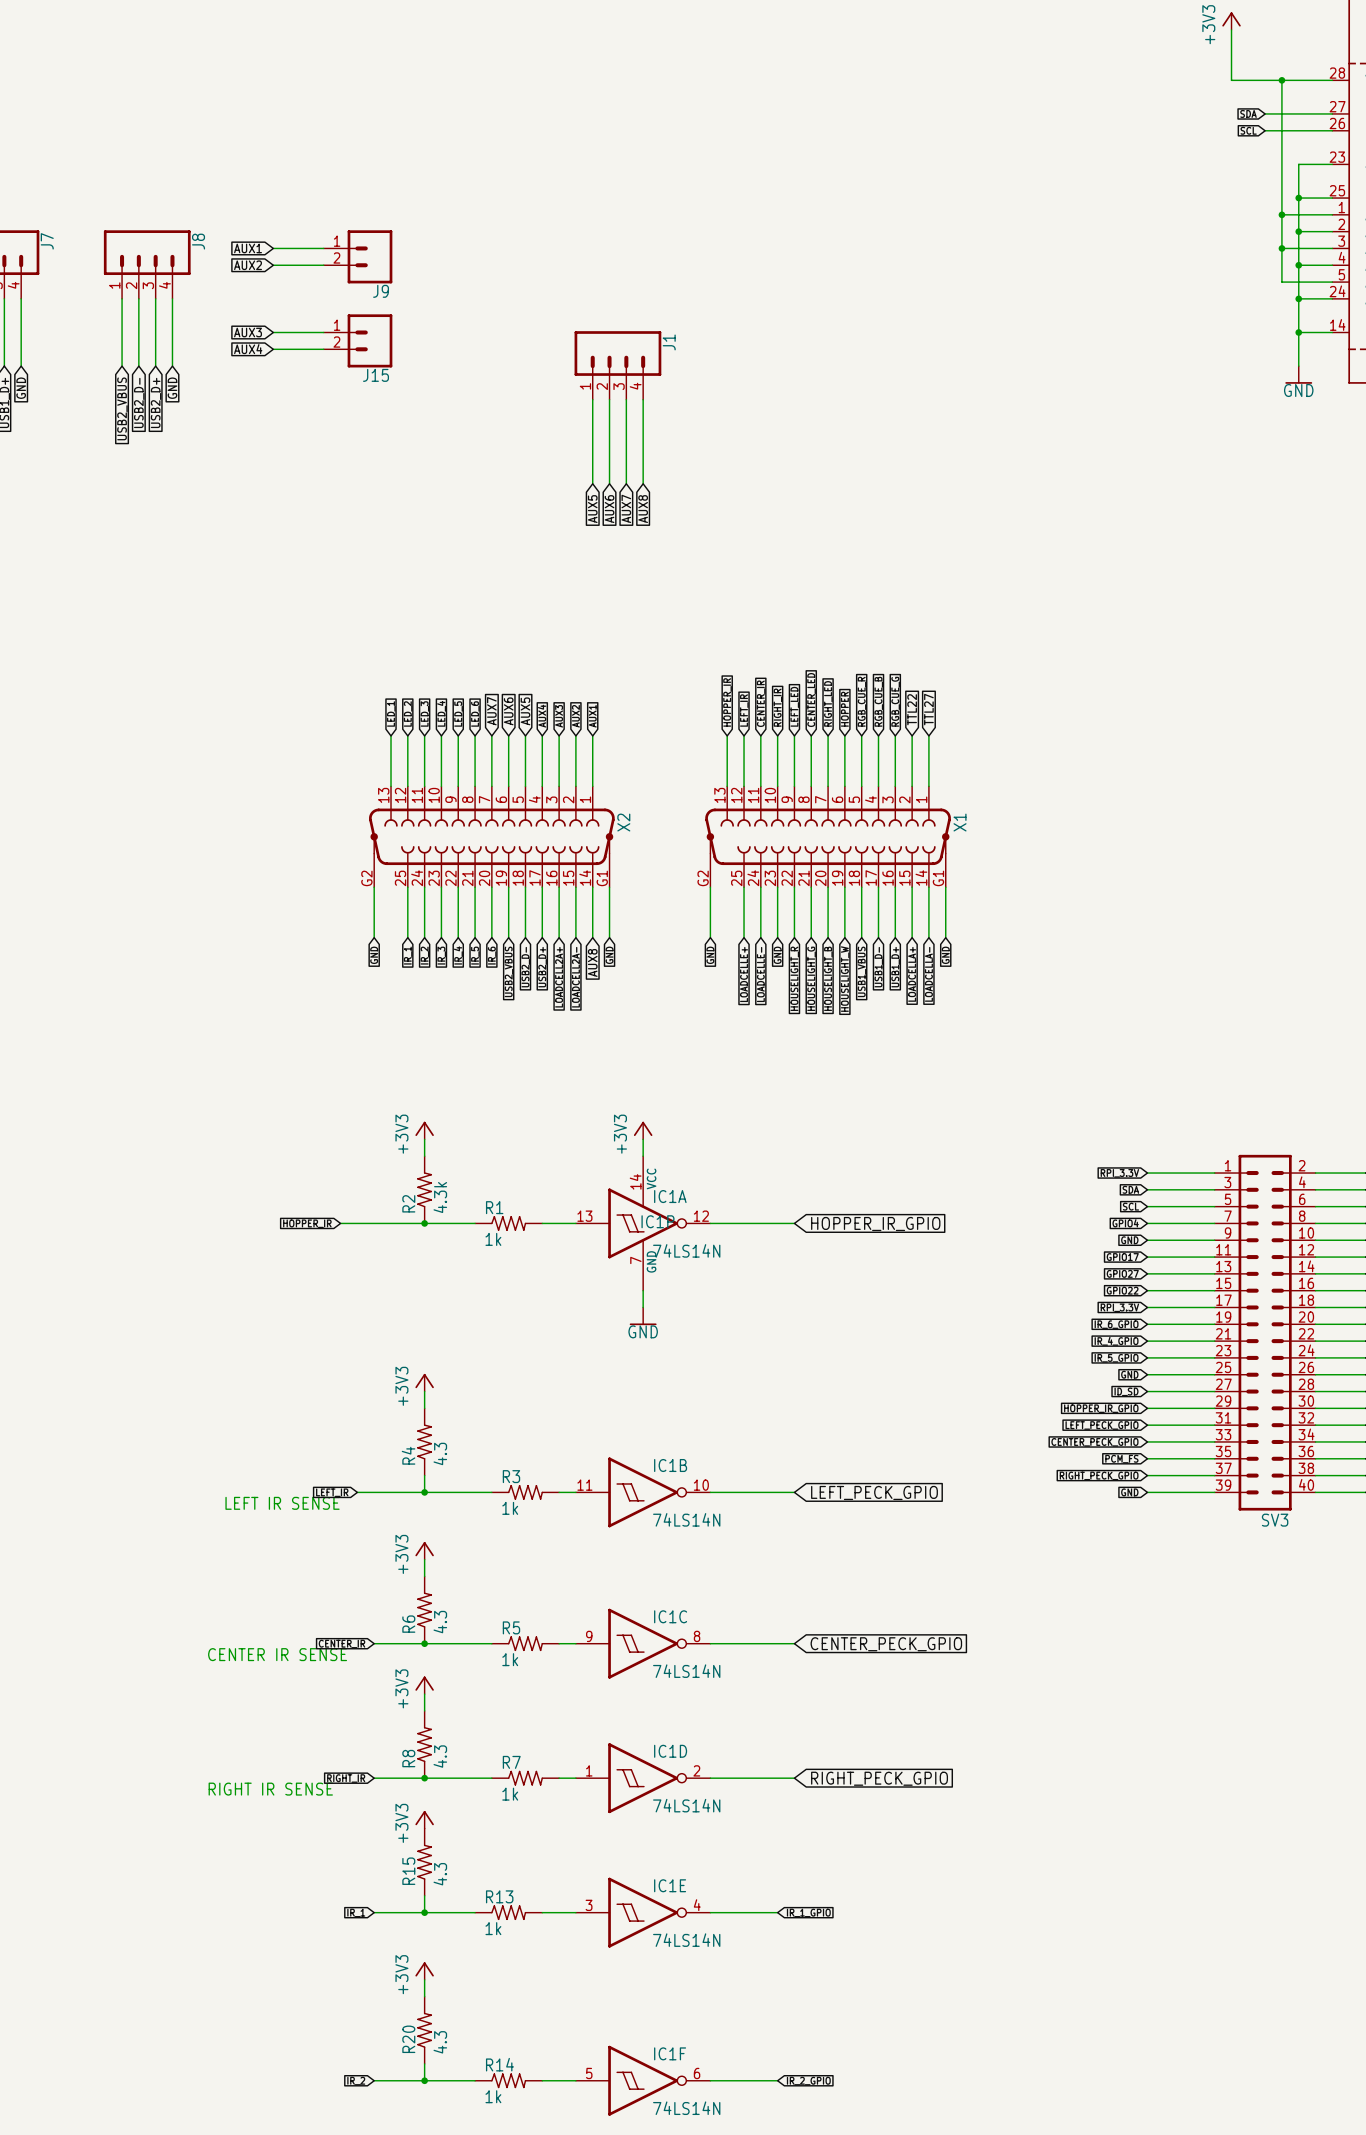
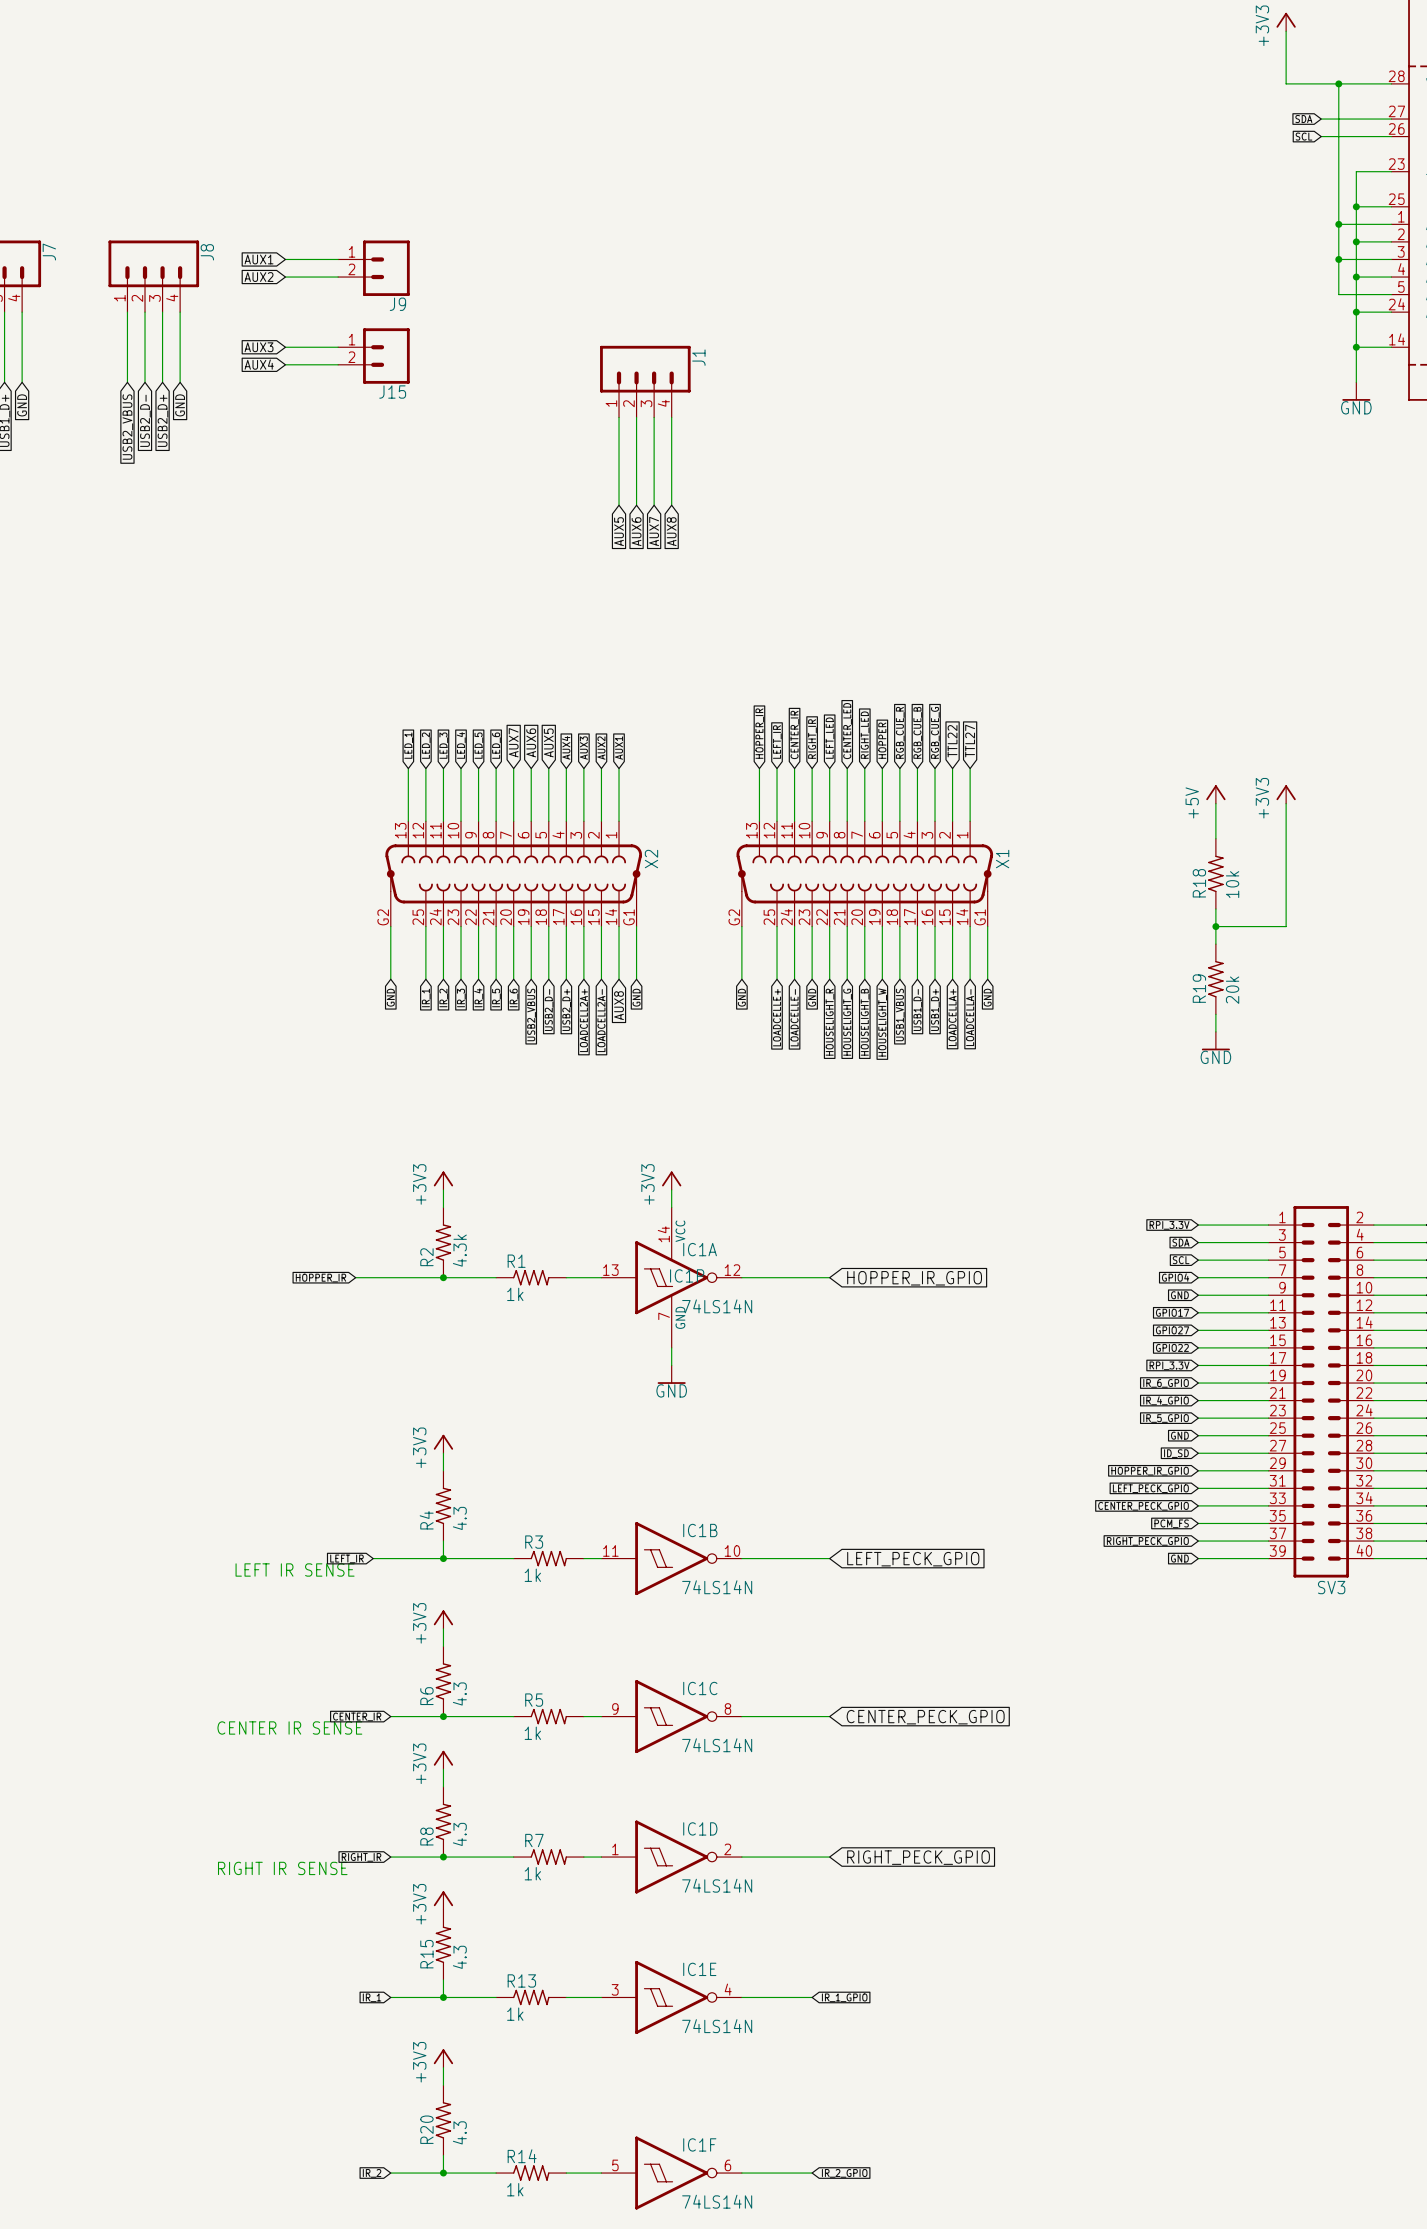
power symbol: none -> +5V (1215, 794)
power symbol: none -> +3V3 (1286, 794)
wire: none -> (1215, 803) (1215, 838)
wire: none -> (1286, 803) (1286, 926) (1215, 926)
R18: none -> 10k (1215, 873)
wire: none -> (1215, 909) (1215, 944)
junction: none -> (1215, 926)
R19: none -> 20k (1215, 979)
wire: none -> (1215, 1014) (1215, 1031)
power symbol: none -> GND (1215, 1041)

